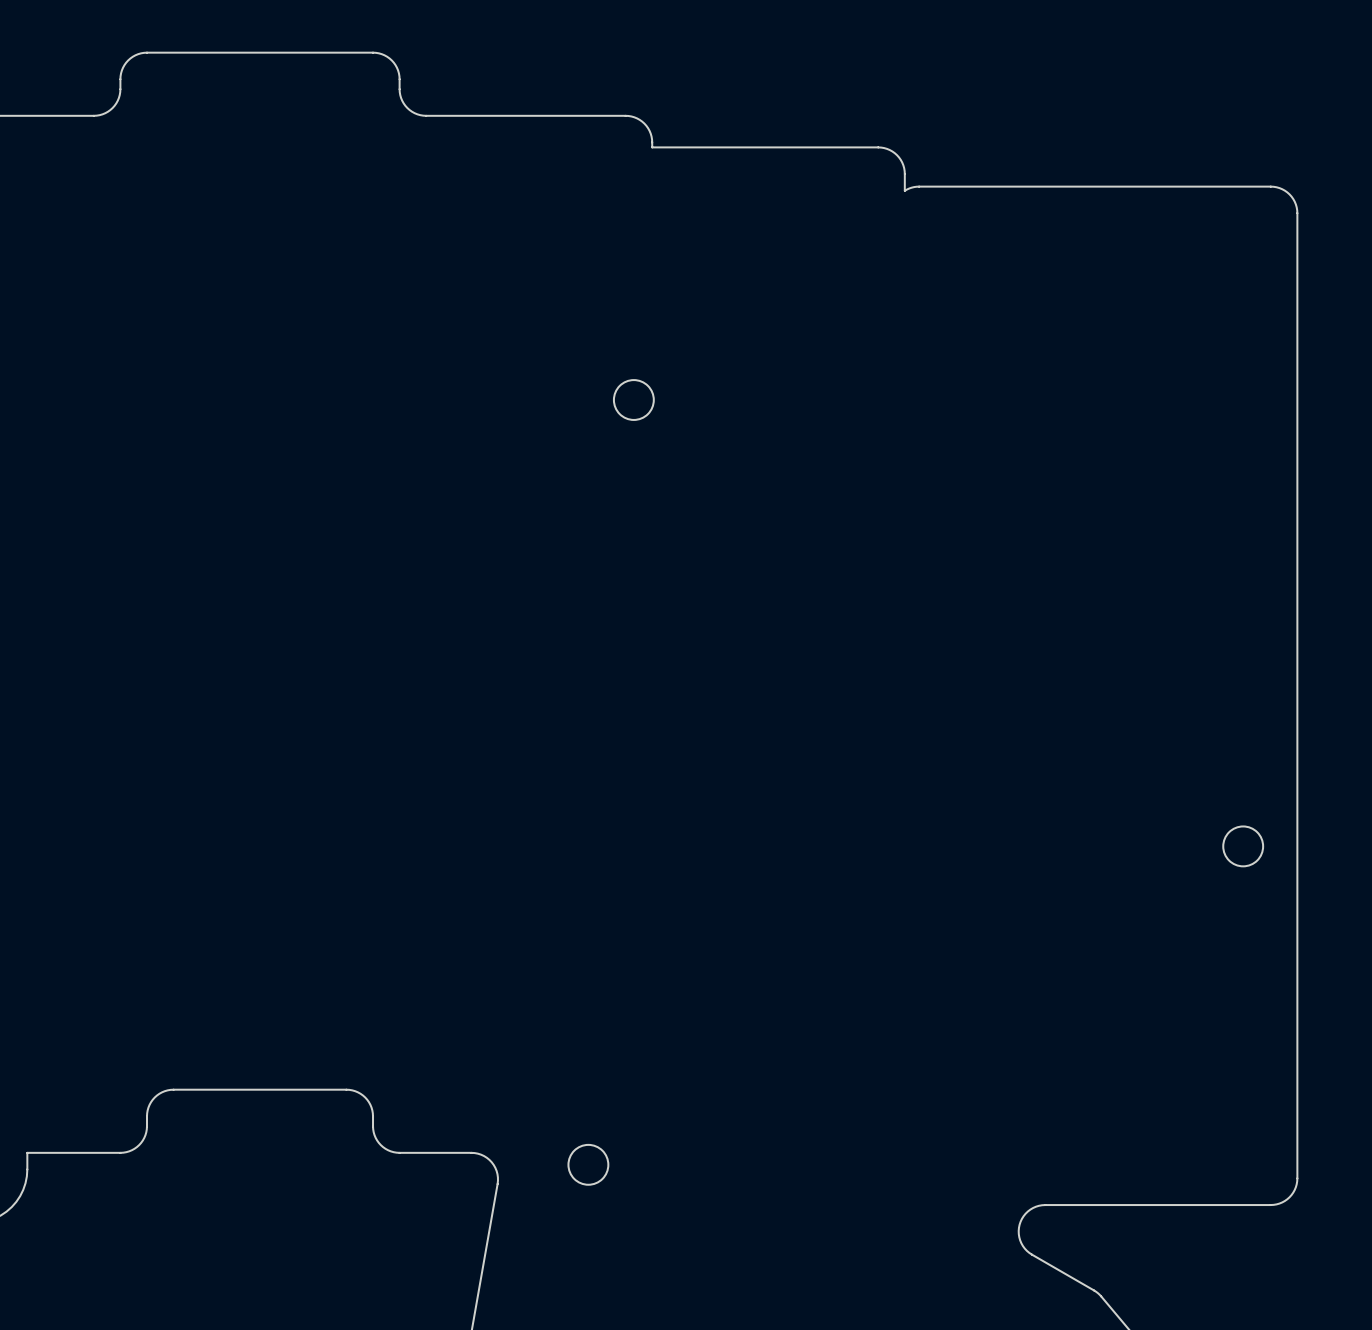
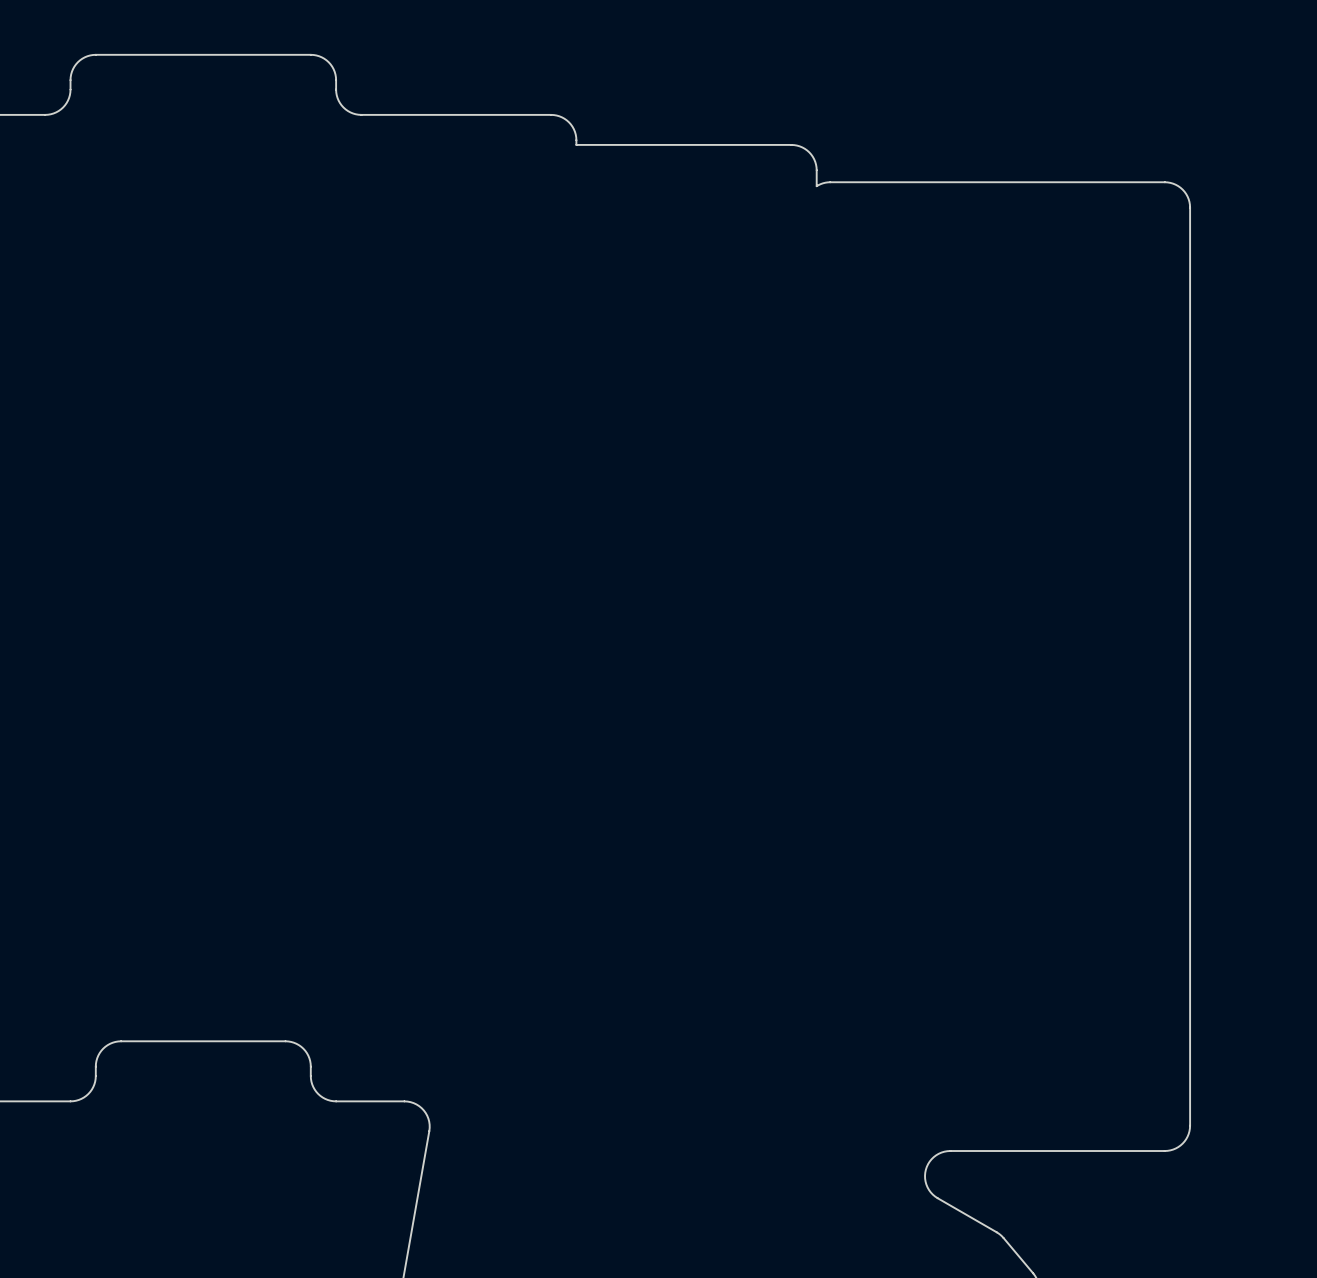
round board edge: [612, 379, 655, 421] -> none
round board edge: [1222, 825, 1265, 868] -> none
round board edge: [567, 1143, 610, 1186] -> none

